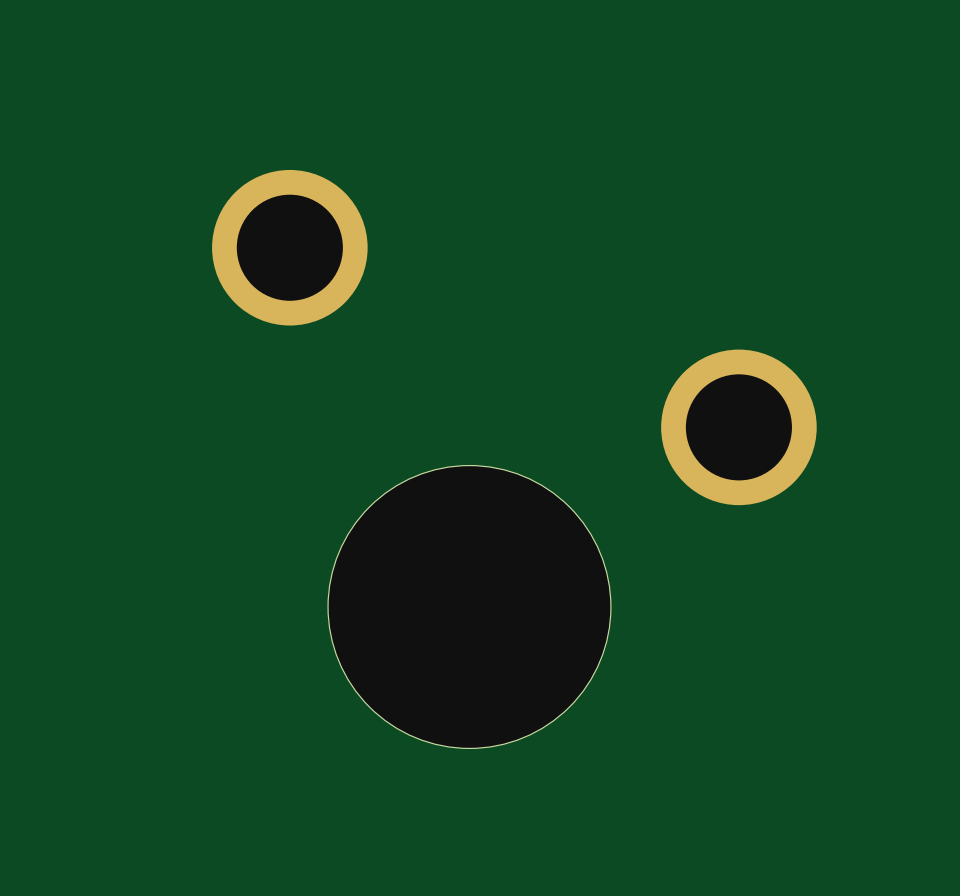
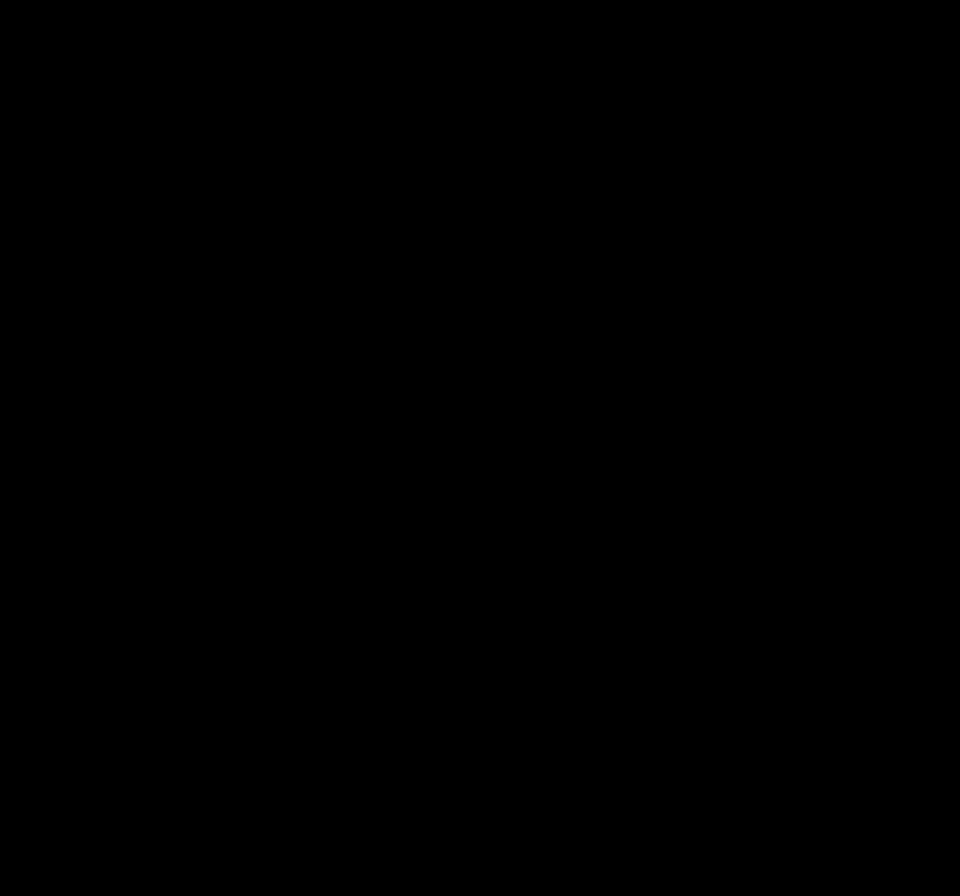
part: (514, 459) -> none

